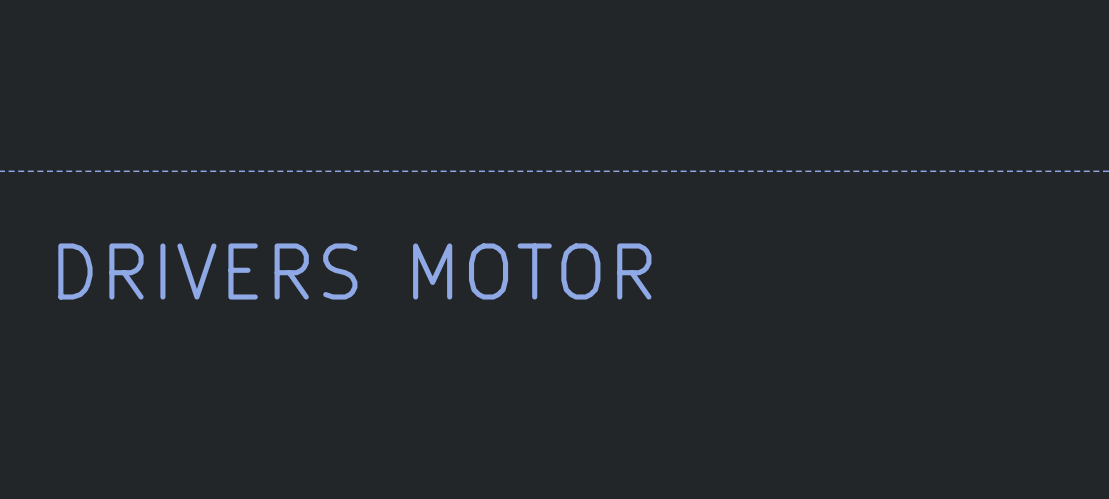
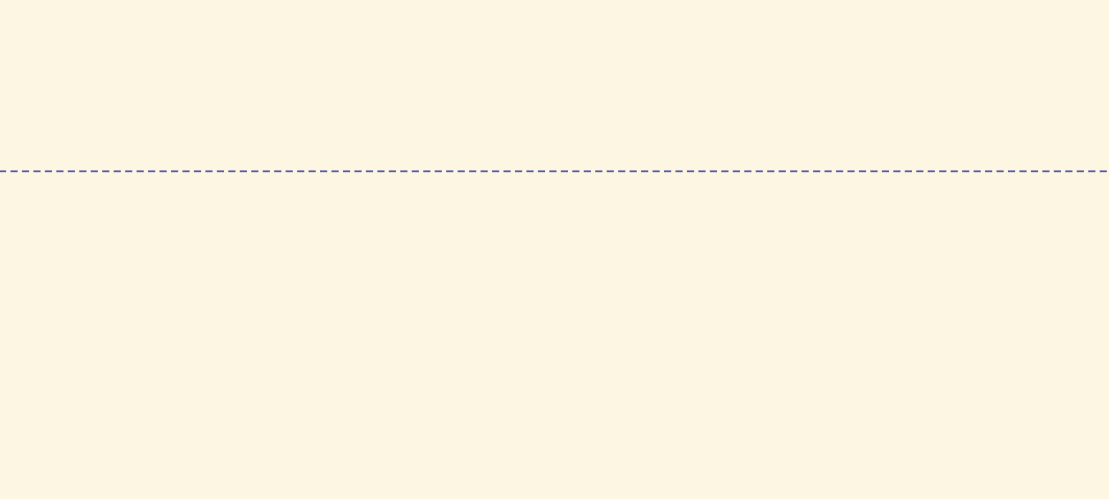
text: DRIVERS MOTOR (354, 271) -> none

